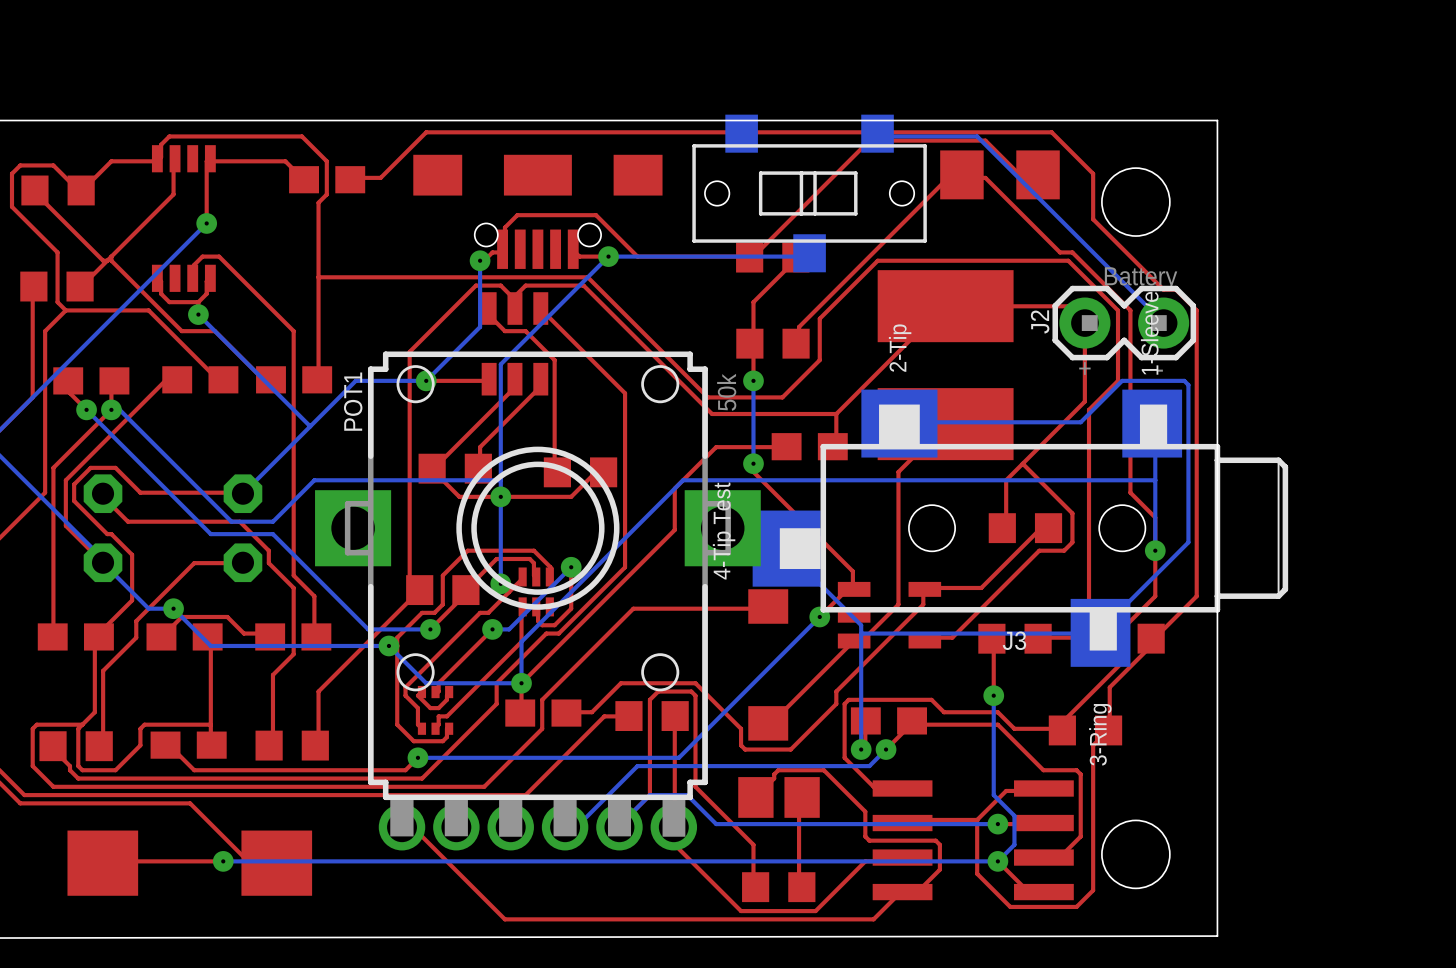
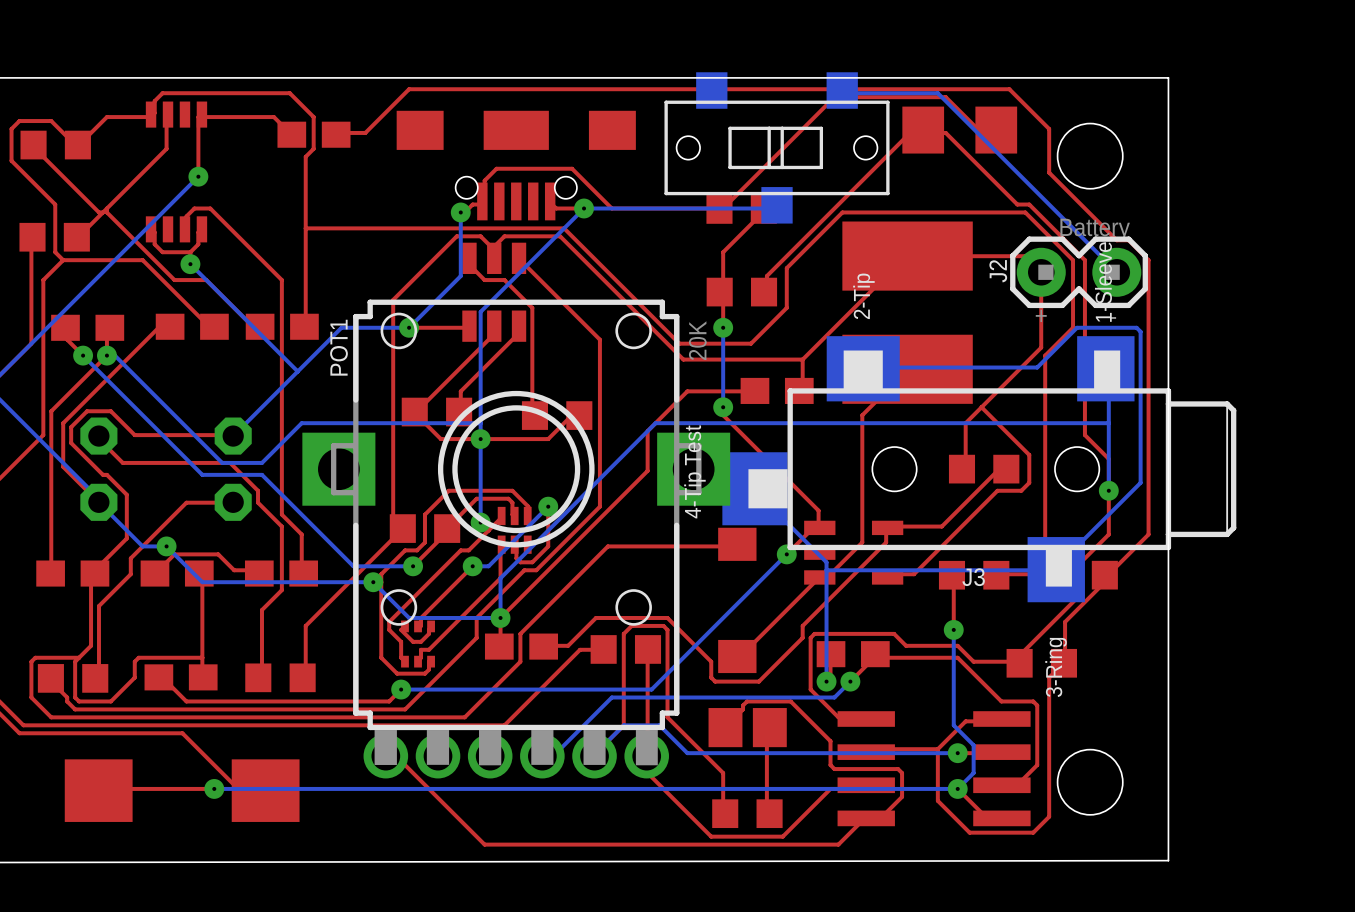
POT1 value: 50k (726, 392) -> 20K (697, 340)

